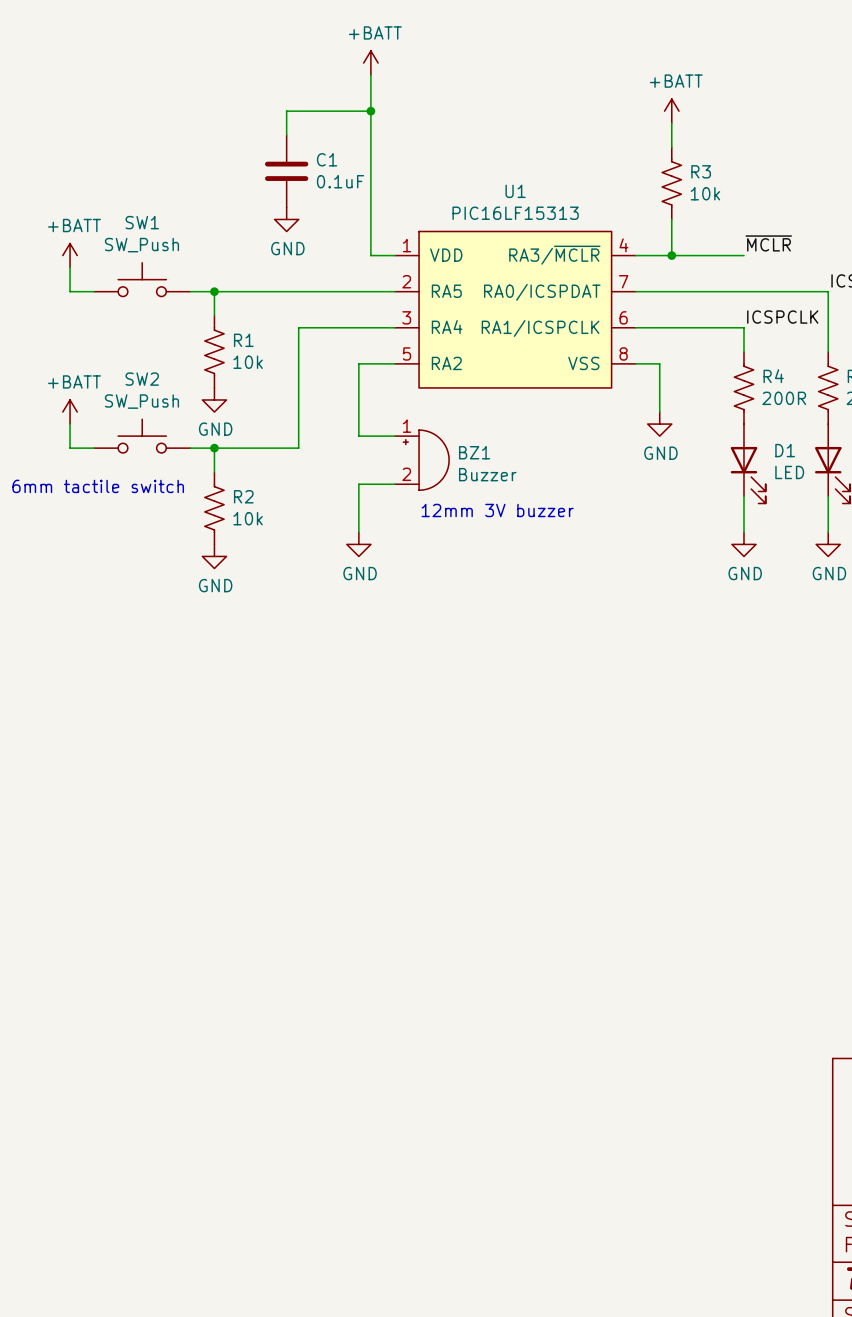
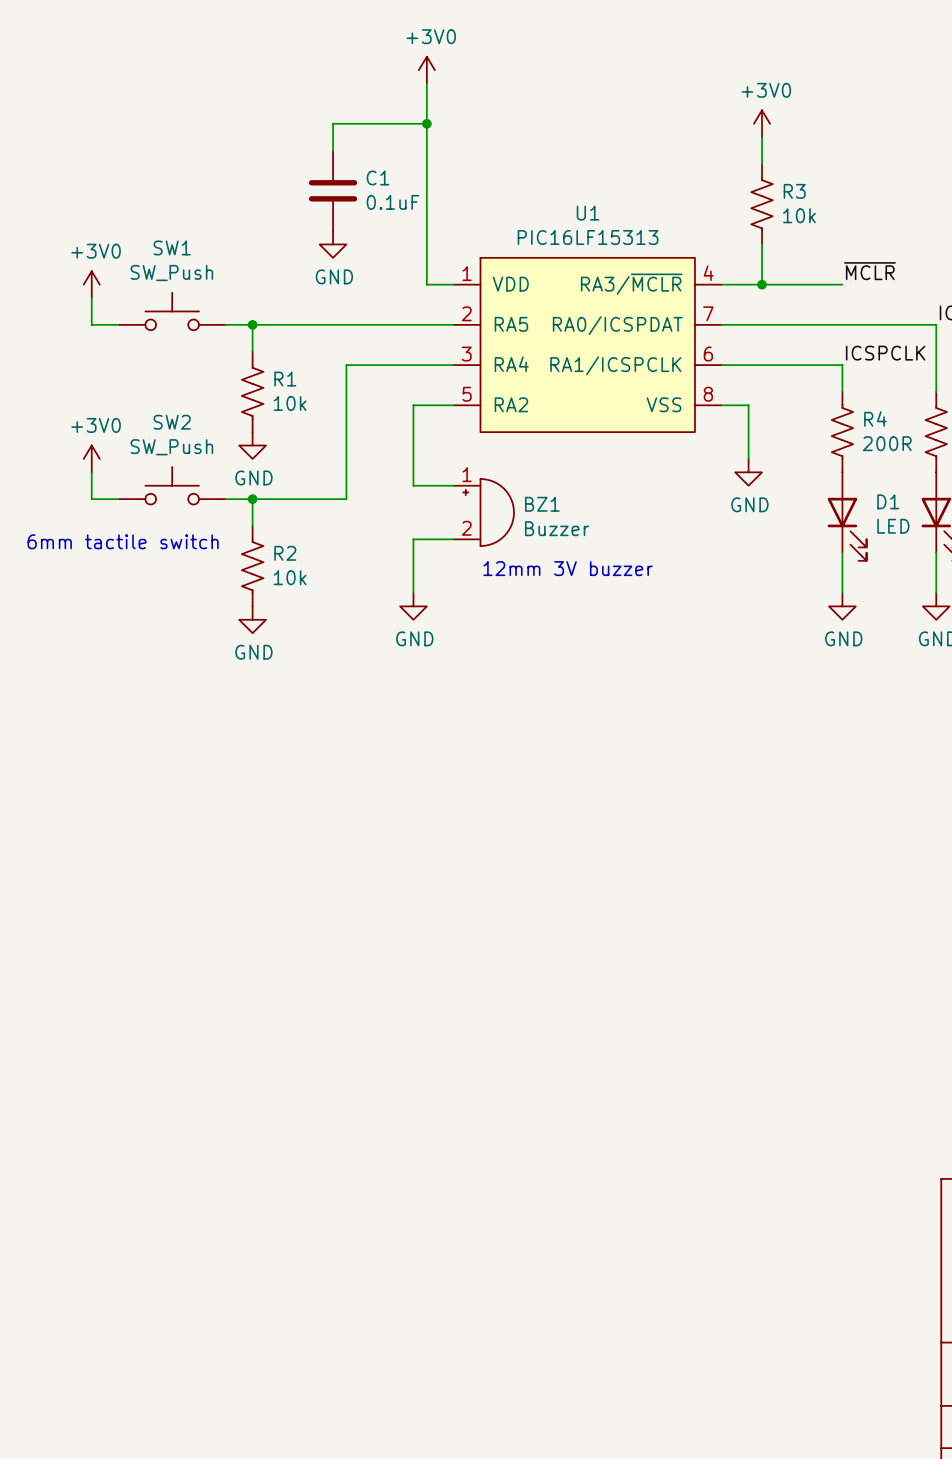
power symbol: +BATT (370, 63) -> +3V0 (426, 70)
power symbol: +BATT (671, 111) -> +3V0 (762, 123)
power symbol: +BATT (70, 255) -> +3V0 (91, 284)
power symbol: +BATT (70, 412) -> +3V0 (91, 458)

